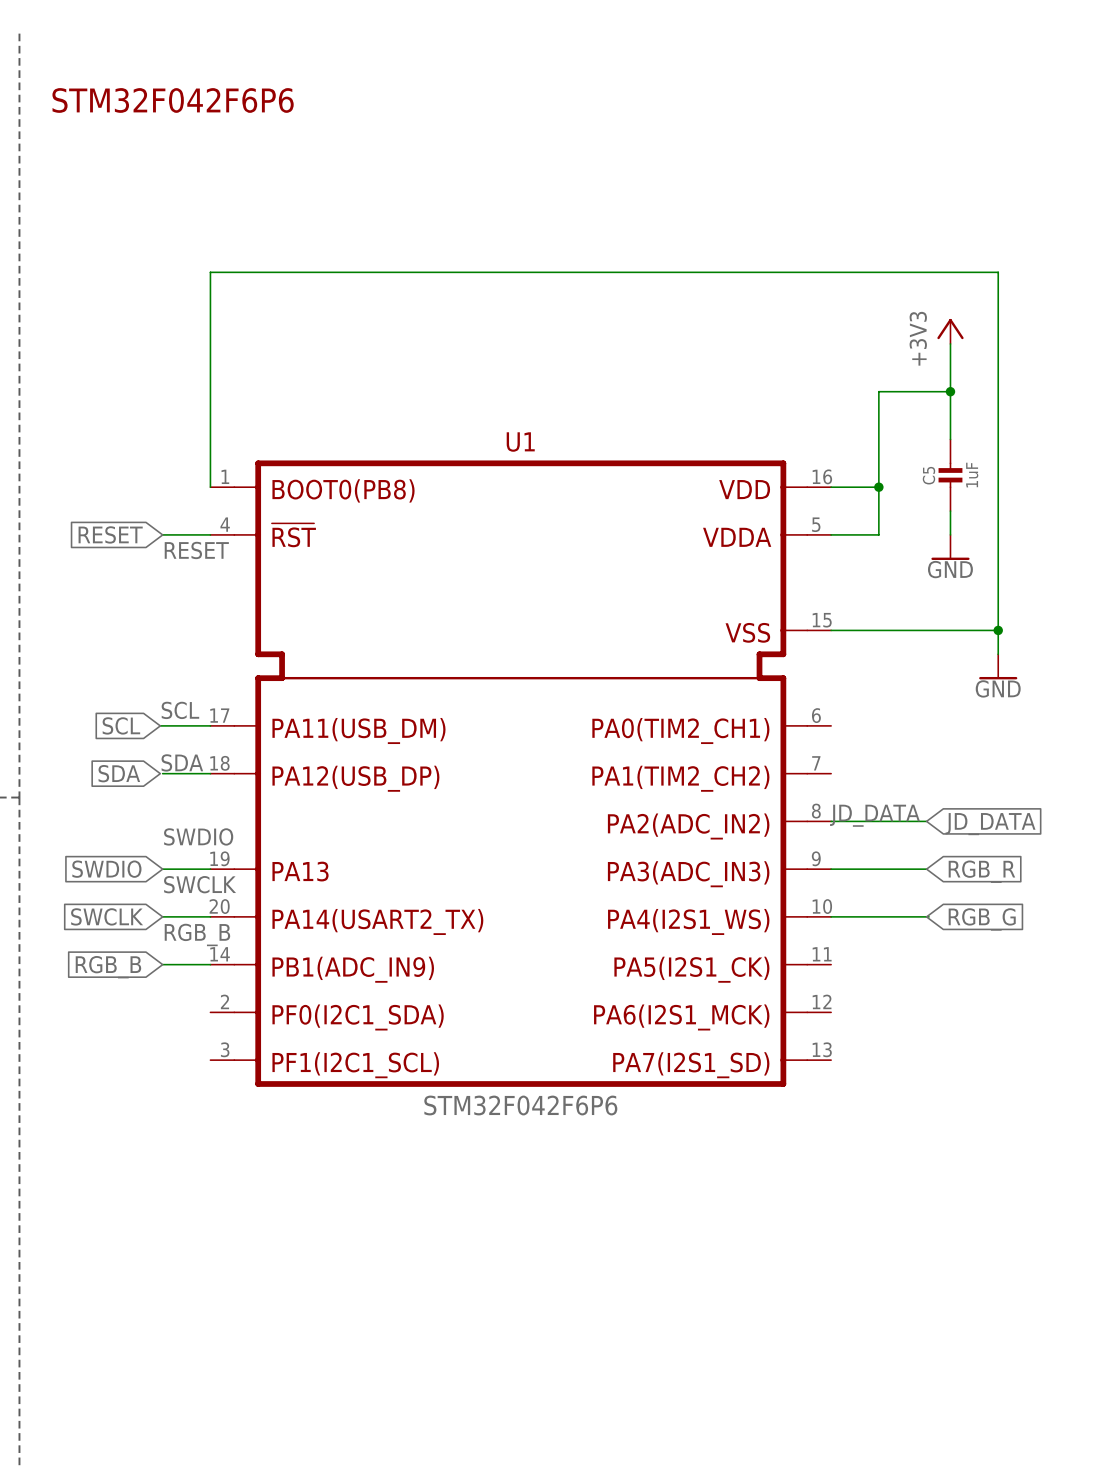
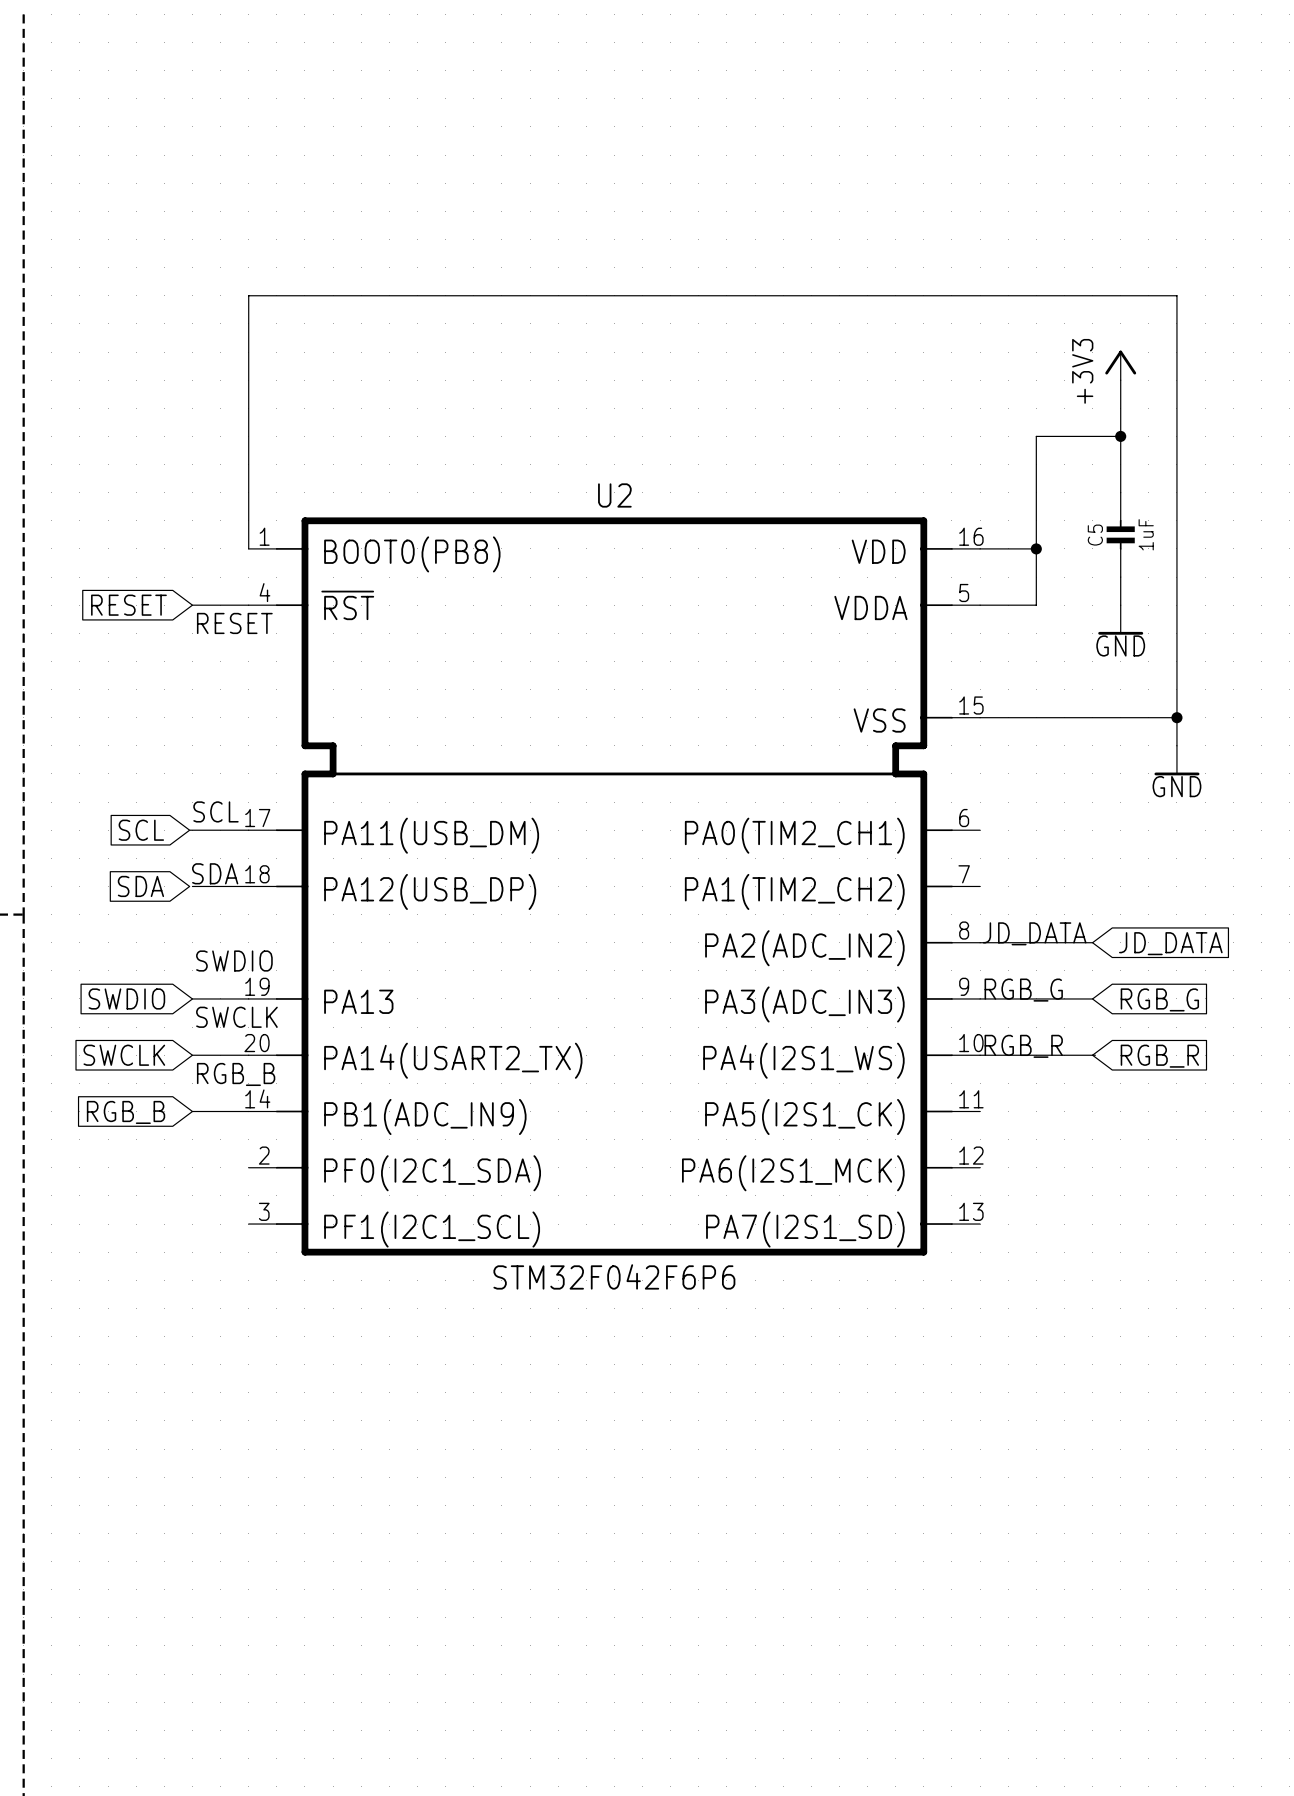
text: STM32F042F6P6 (173, 100) -> none
U1 name: U1 (520, 442) -> U2 (614, 495)
label: none -> RGB_G (1023, 990)
global label: RGB_R (981, 871) -> RGB_G (1159, 999)
label: none -> RGB_R (1023, 1046)
global label: RGB_G (982, 919) -> RGB_R (1159, 1056)

